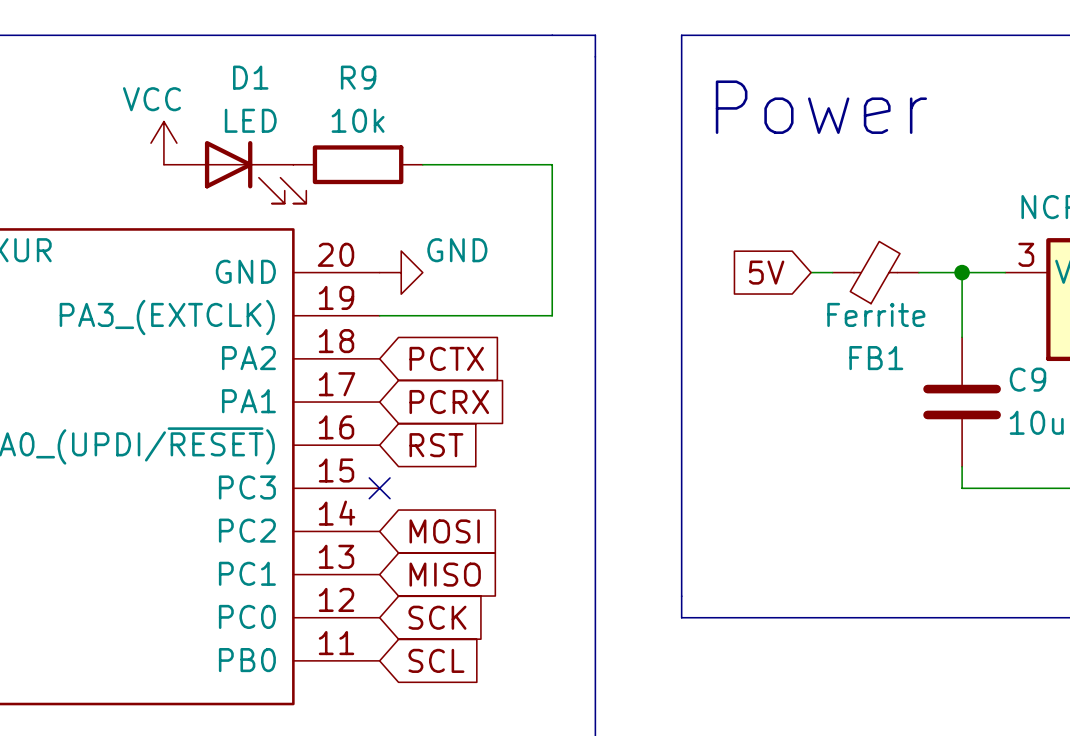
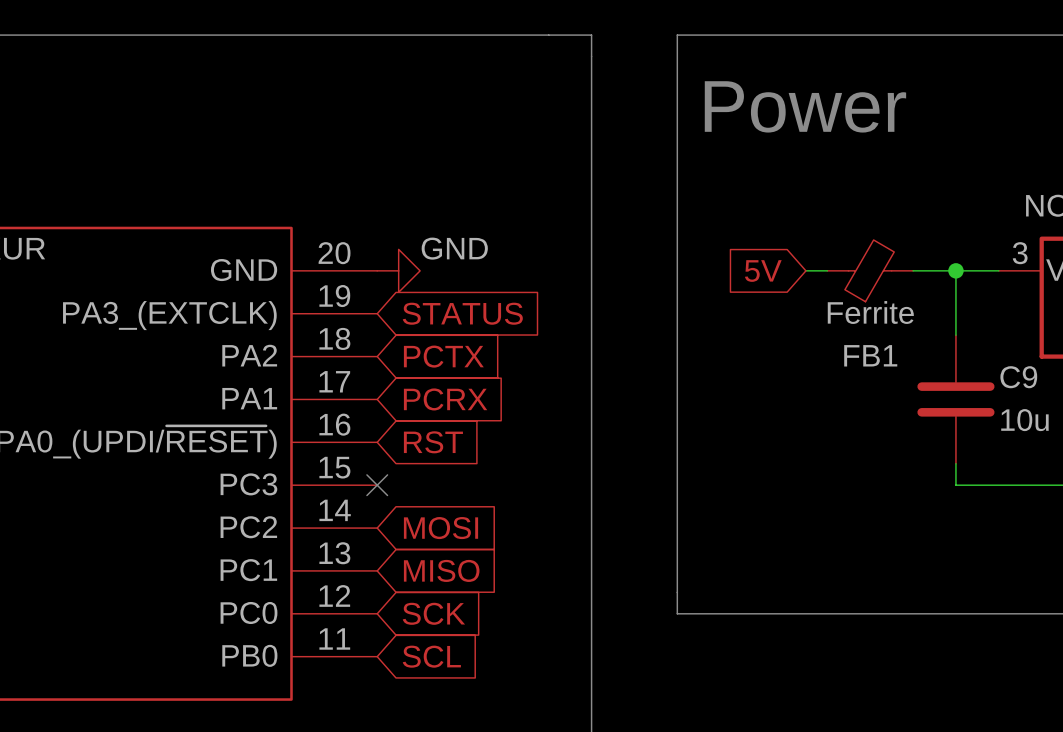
power symbol: VCC (163, 143) -> none
R9: 10k (358, 164) -> none
wire: (422, 164) (552, 164) (552, 315) (379, 315) -> none
D1: LED (235, 172) -> none
global label: none -> STATUS (462, 313)

